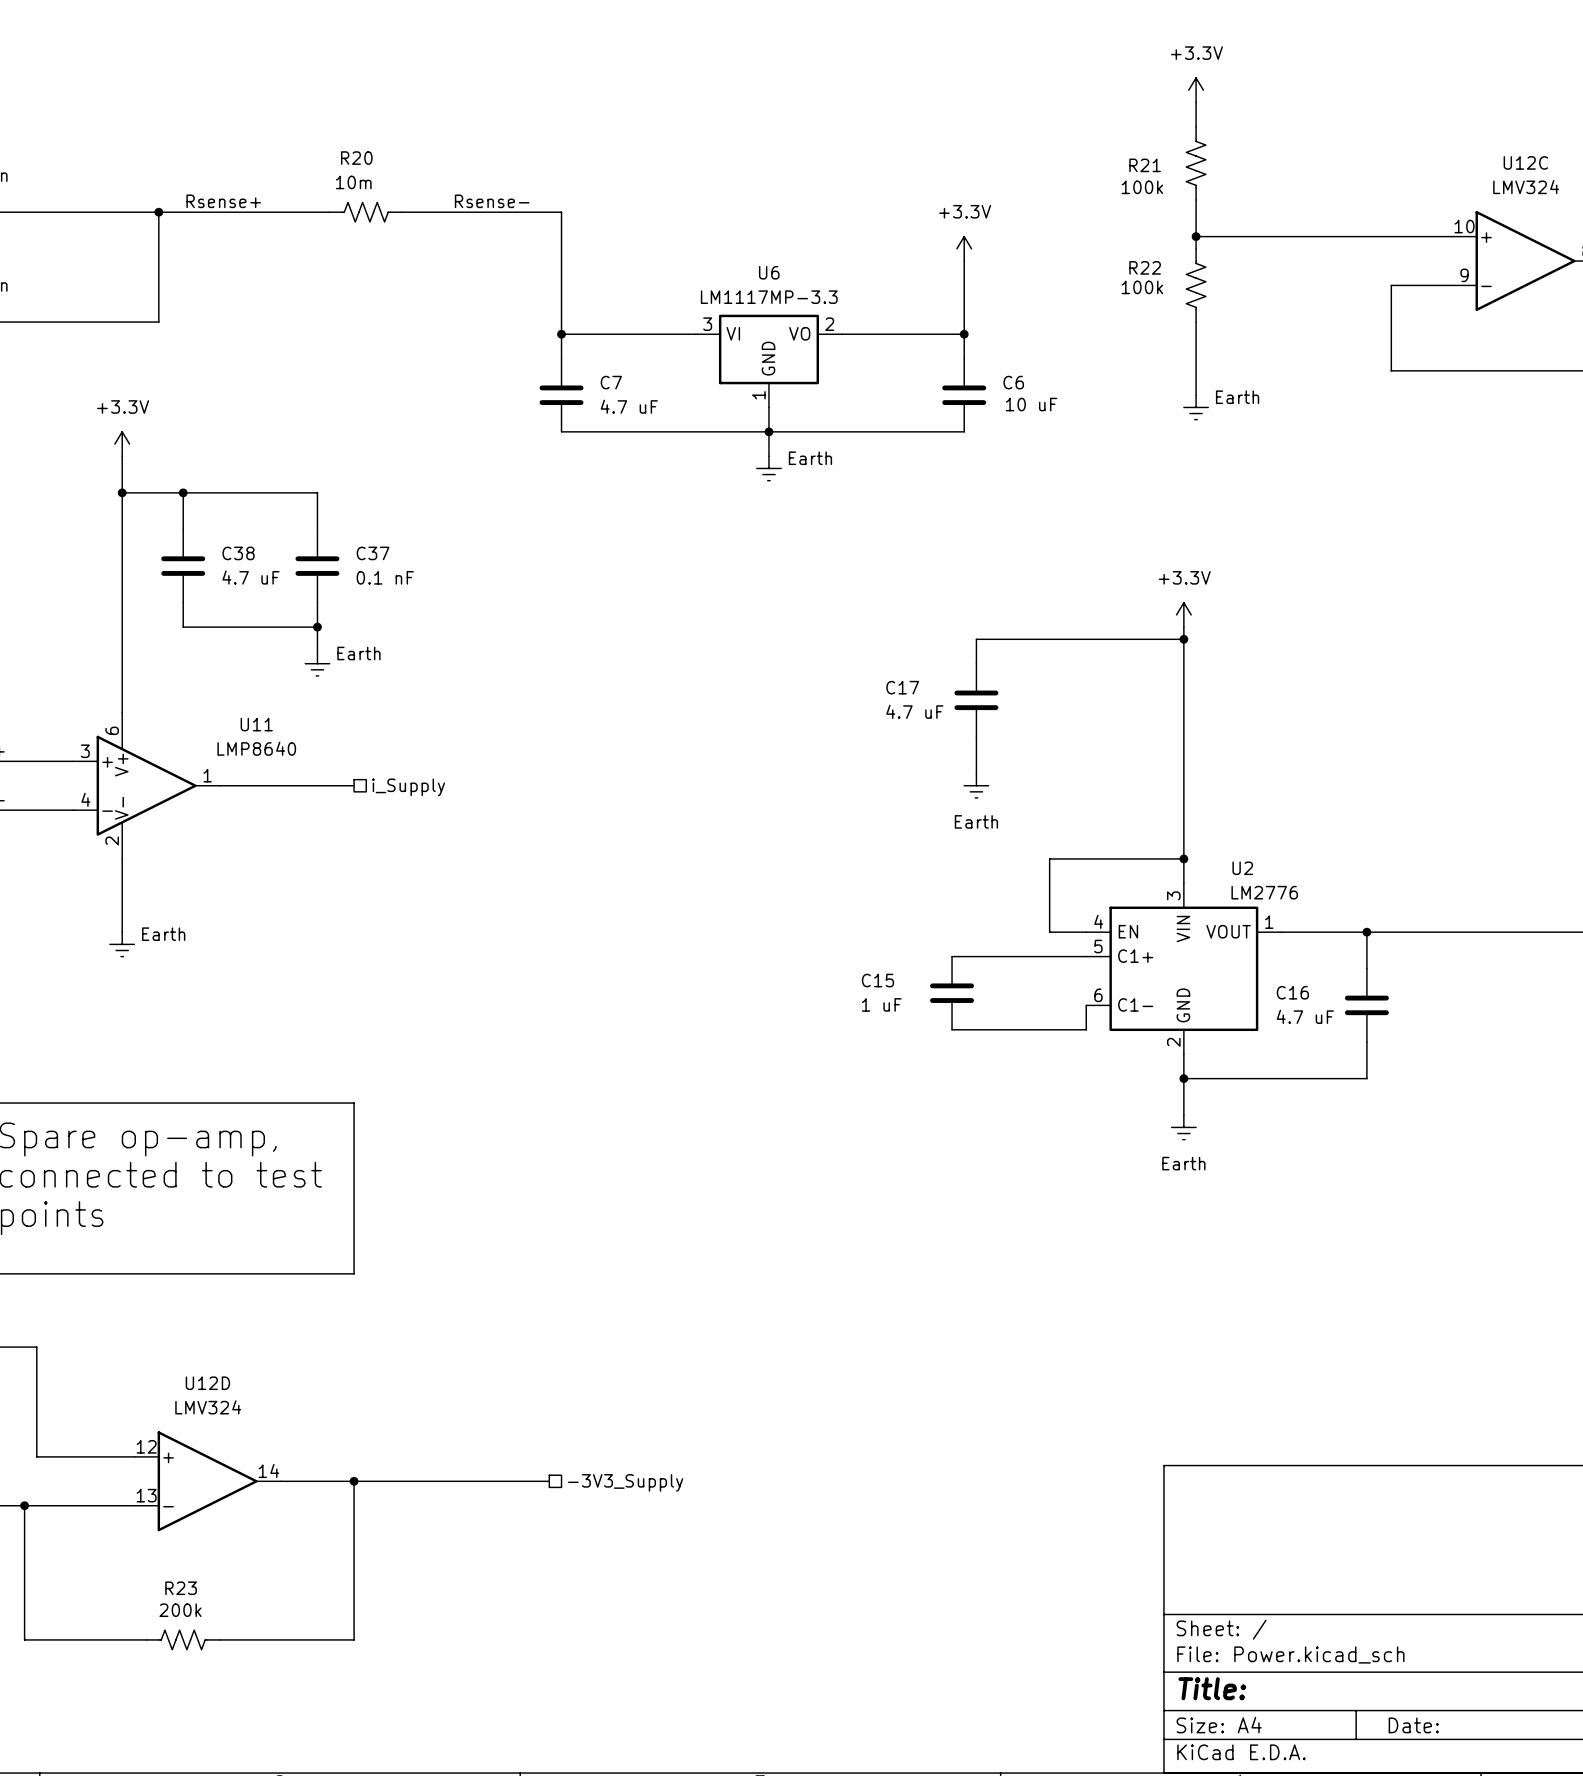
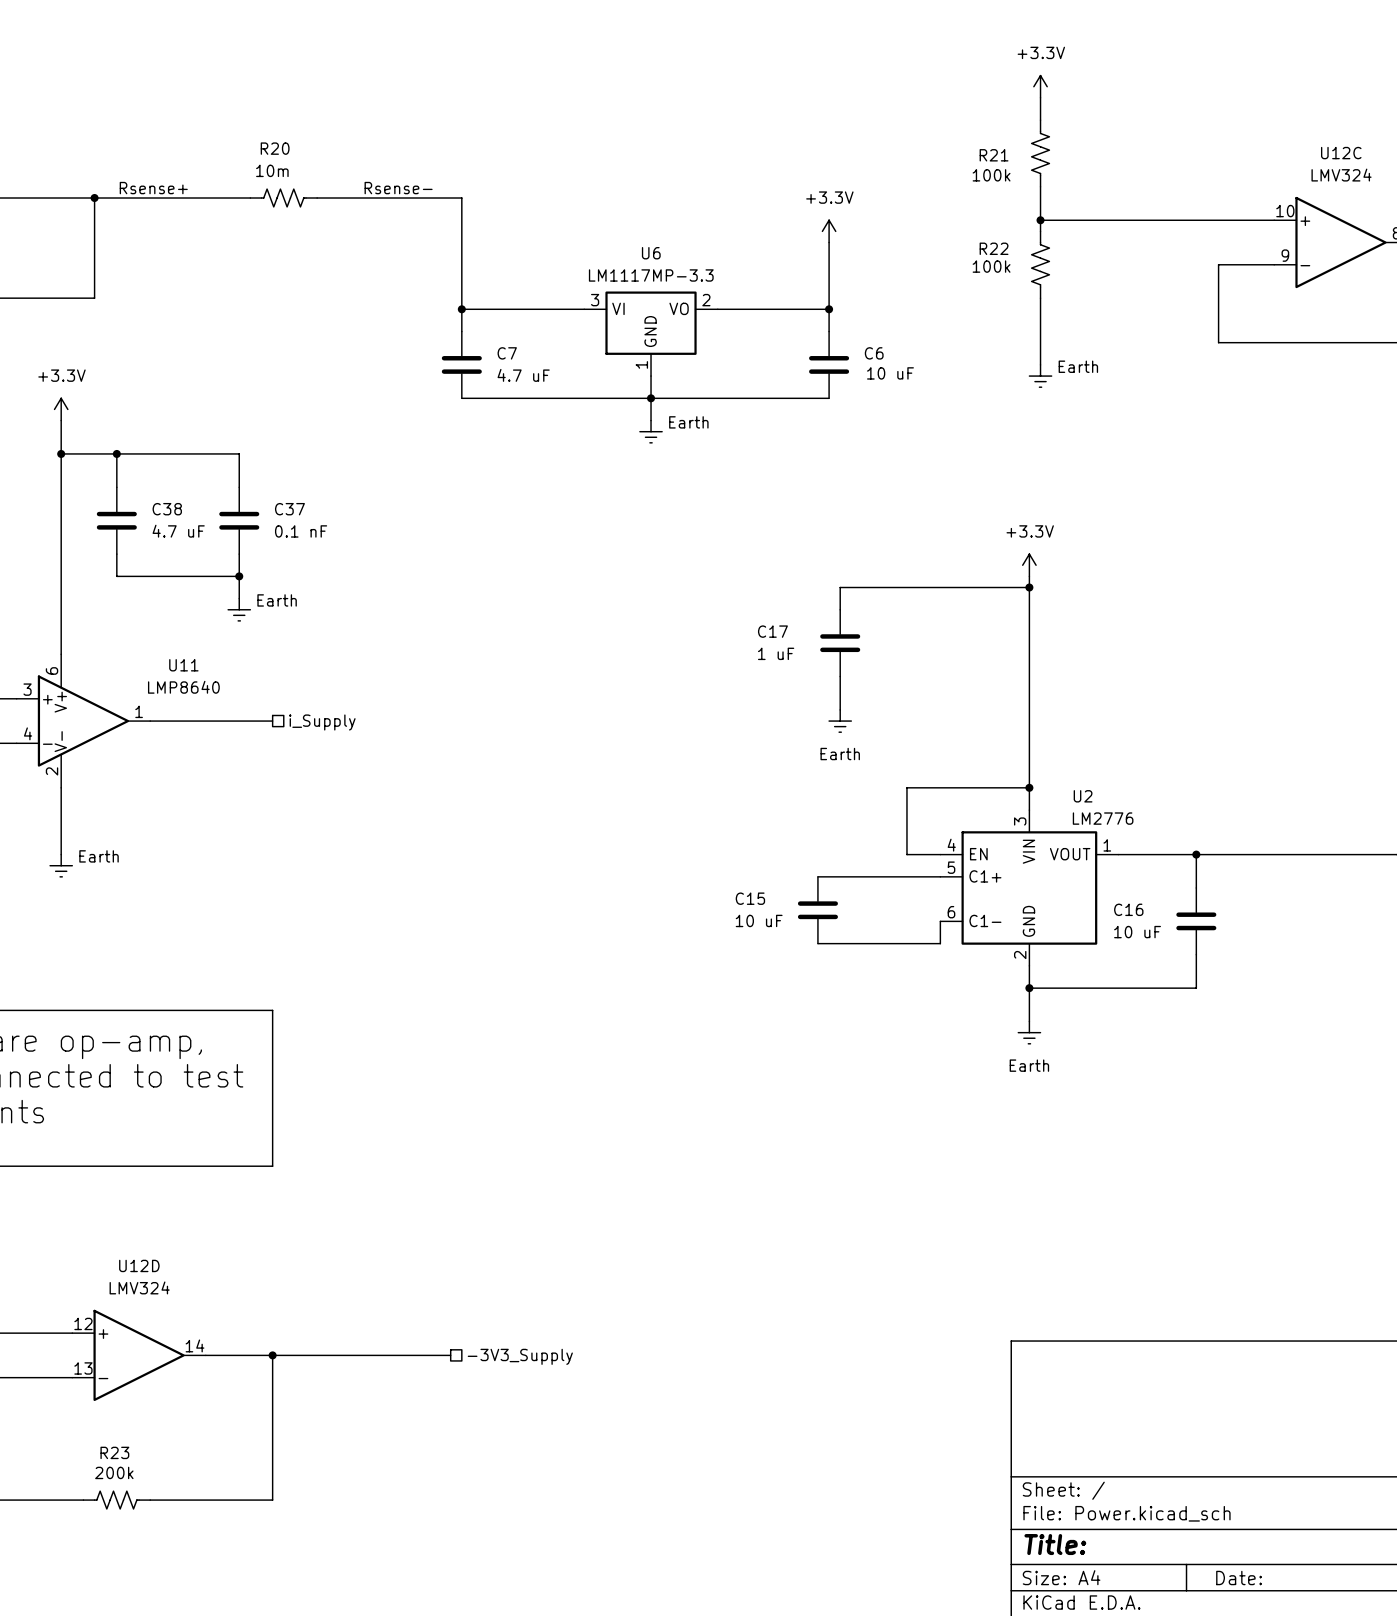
C17 value: 4.7 uF (914, 711) -> 1 uF (776, 653)
C15 value: 1 uF (881, 1004) -> 10 uF (759, 920)
C16 value: 4.7 uF (1305, 1016) -> 10 uF (1137, 932)

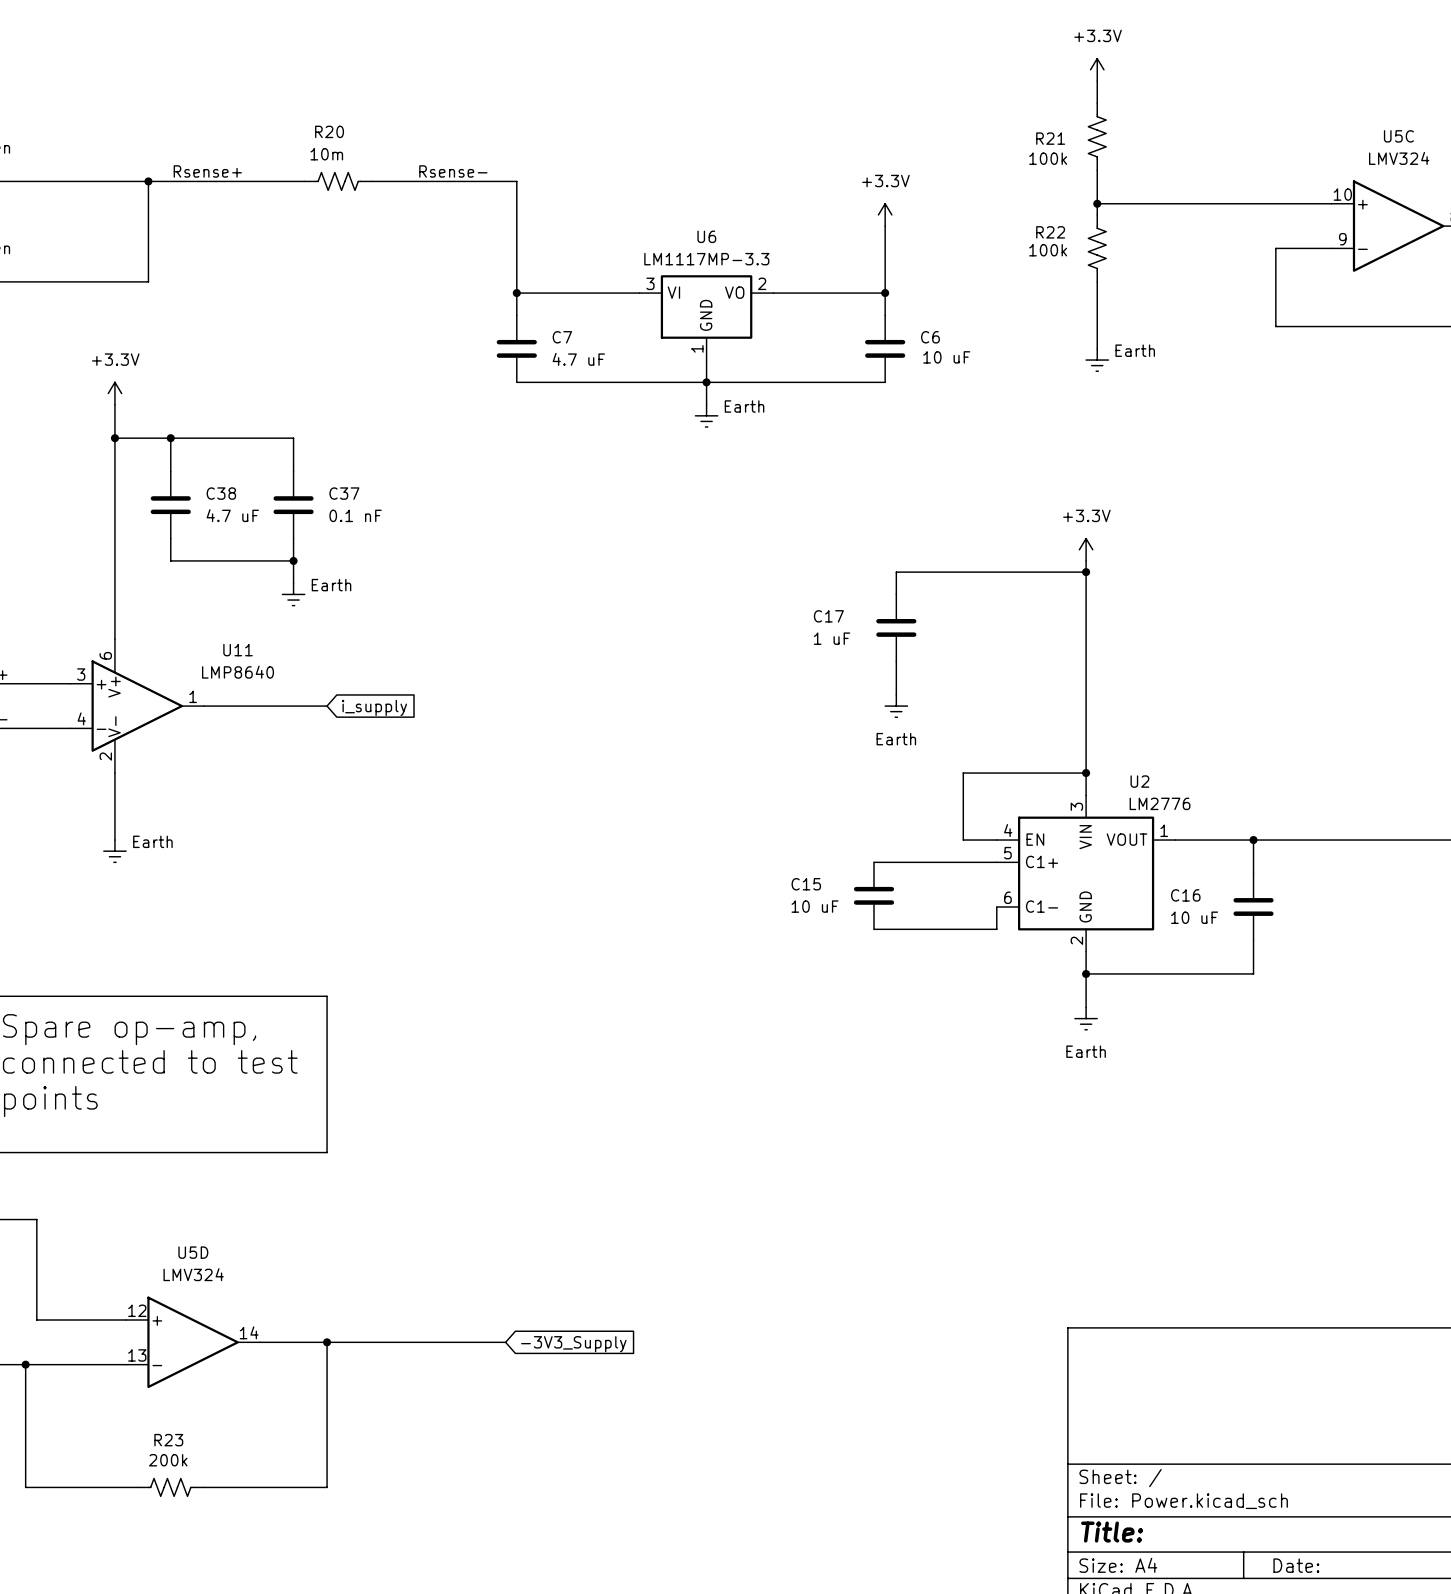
U12C name: U12C (1341, 153) -> U5C (1398, 136)
global label: none -> i_supply (374, 707)
hierarchical label: i_Supply (322, 722) -> none
U12D name: U12D (139, 1265) -> U5D (193, 1252)
hierarchical label: -3V3_Supply (520, 1356) -> none
global label: none -> -3V3_Supply (573, 1344)

